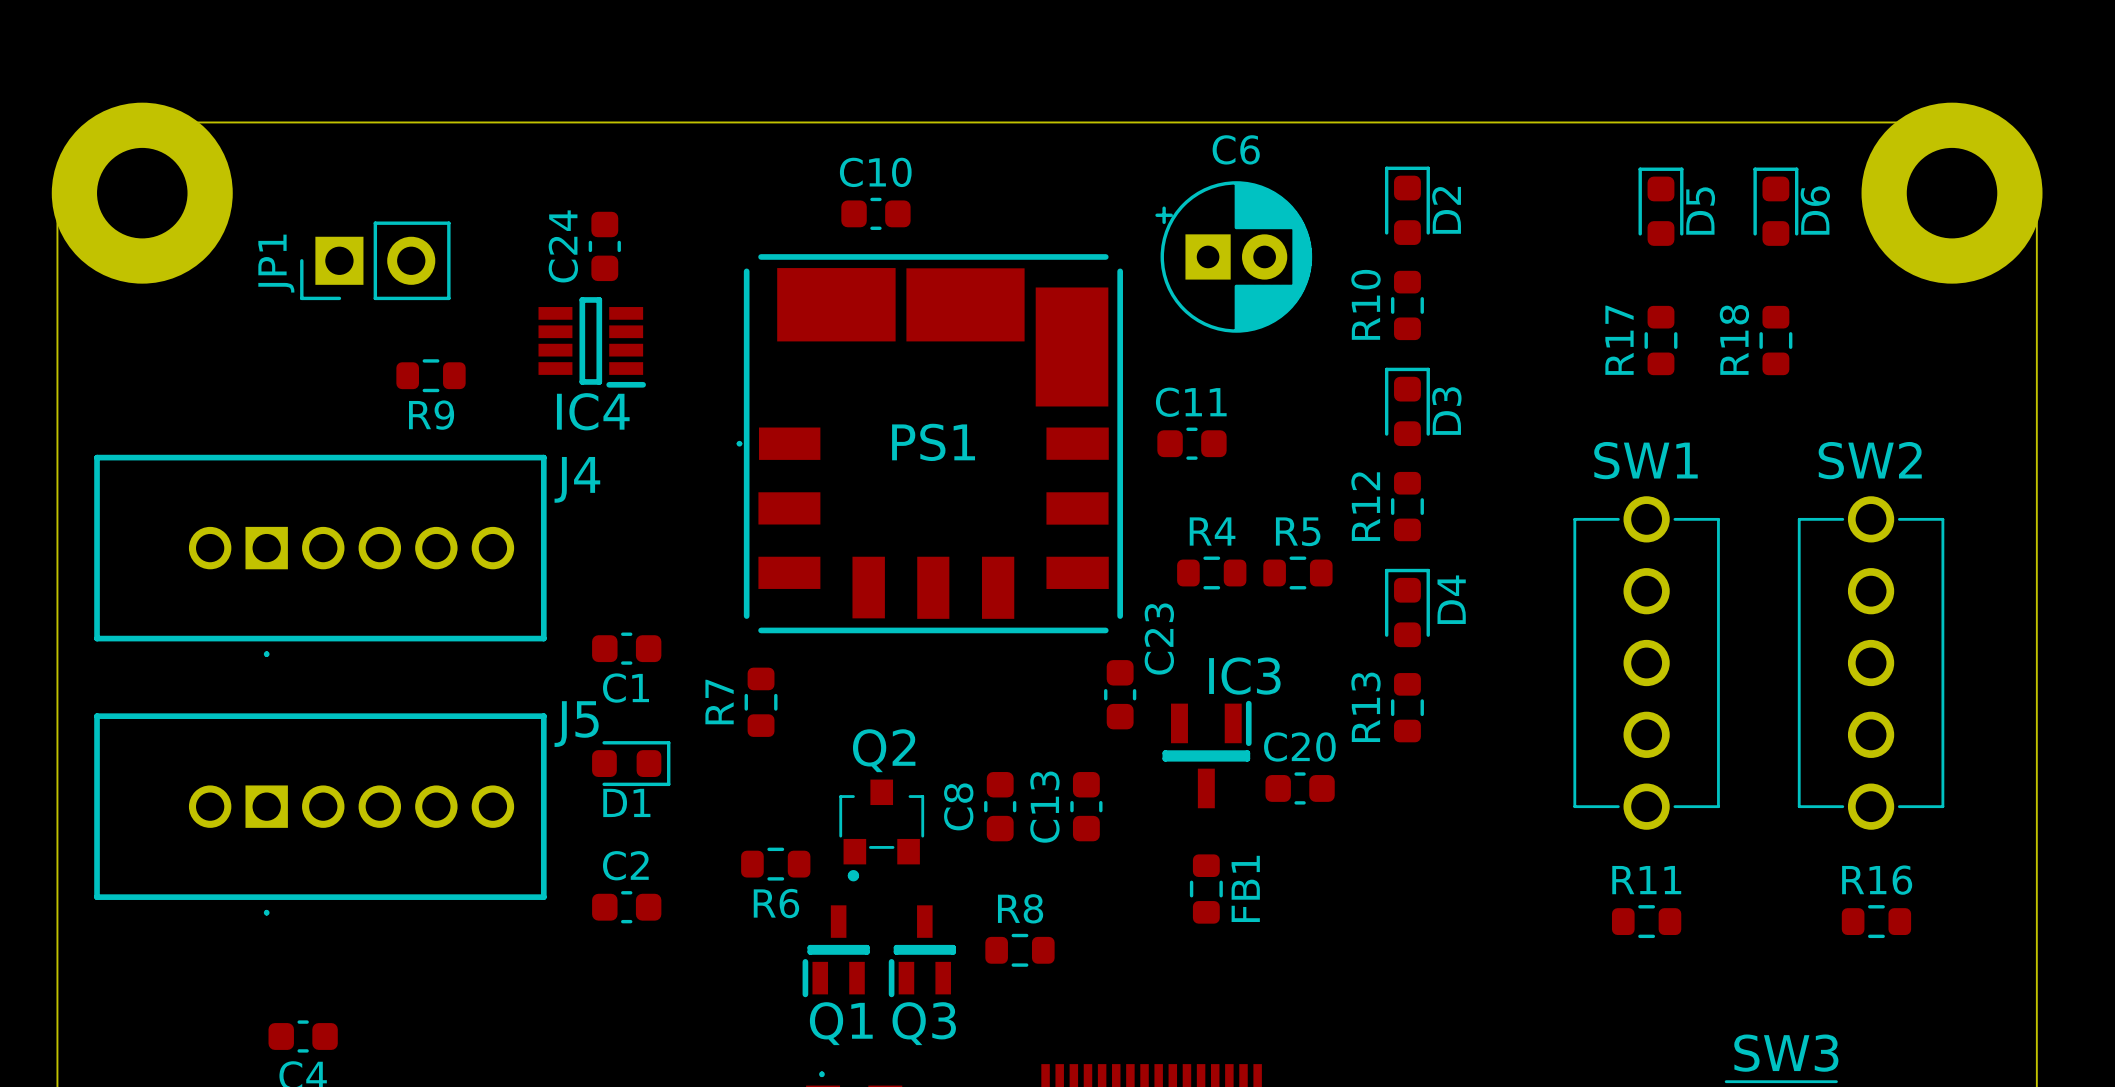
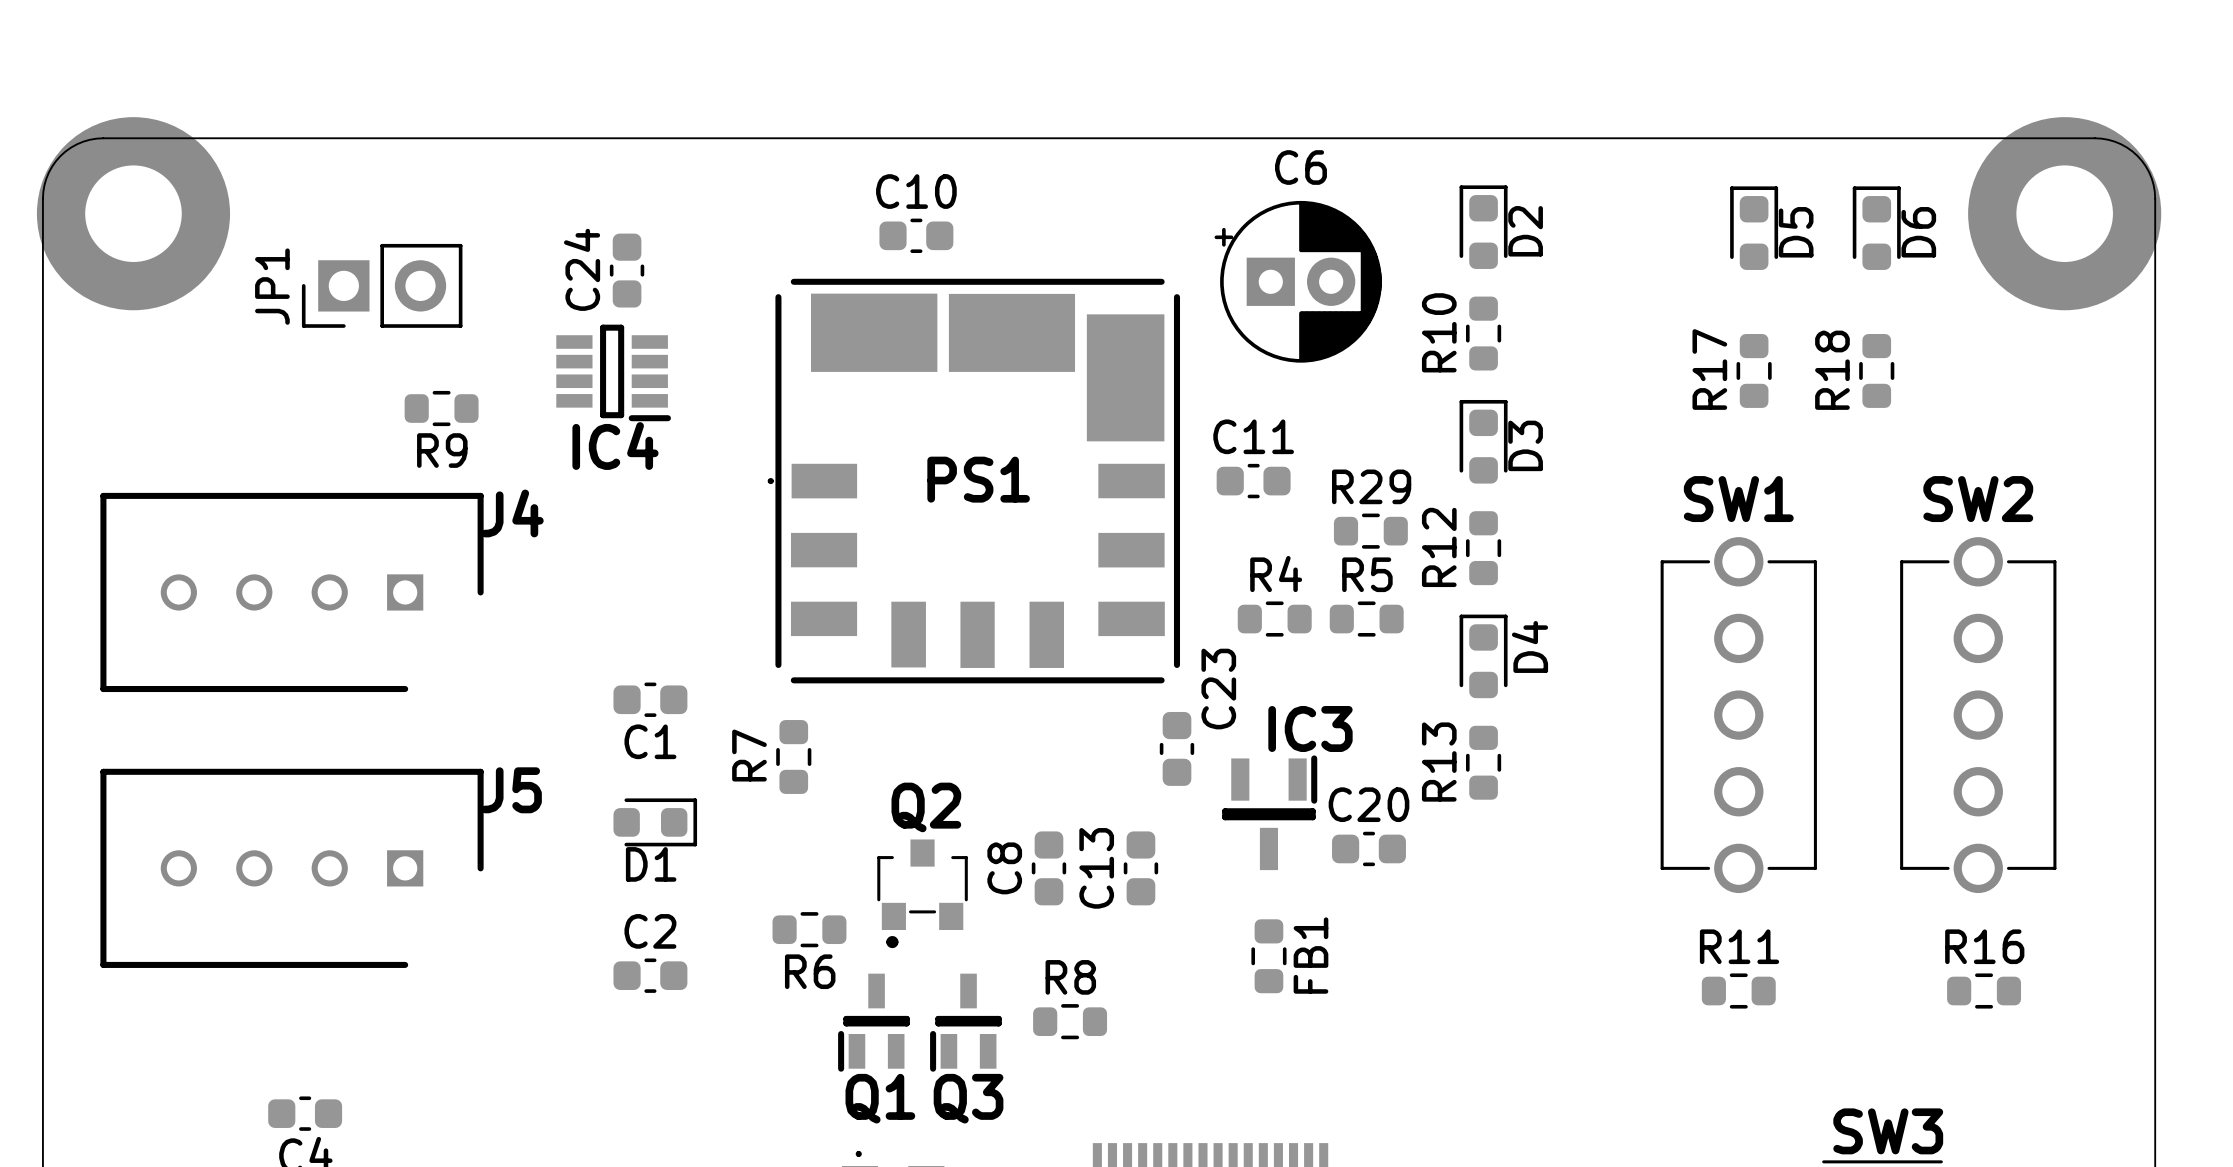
J4 footprint: [94, 454, 547, 657] -> [100, 492, 484, 693]
R29: none -> (1370, 531)
J5 footprint: [94, 713, 547, 916] -> [100, 768, 484, 968]
J5 name position: J5 (576, 724) -> J5 (511, 790)

